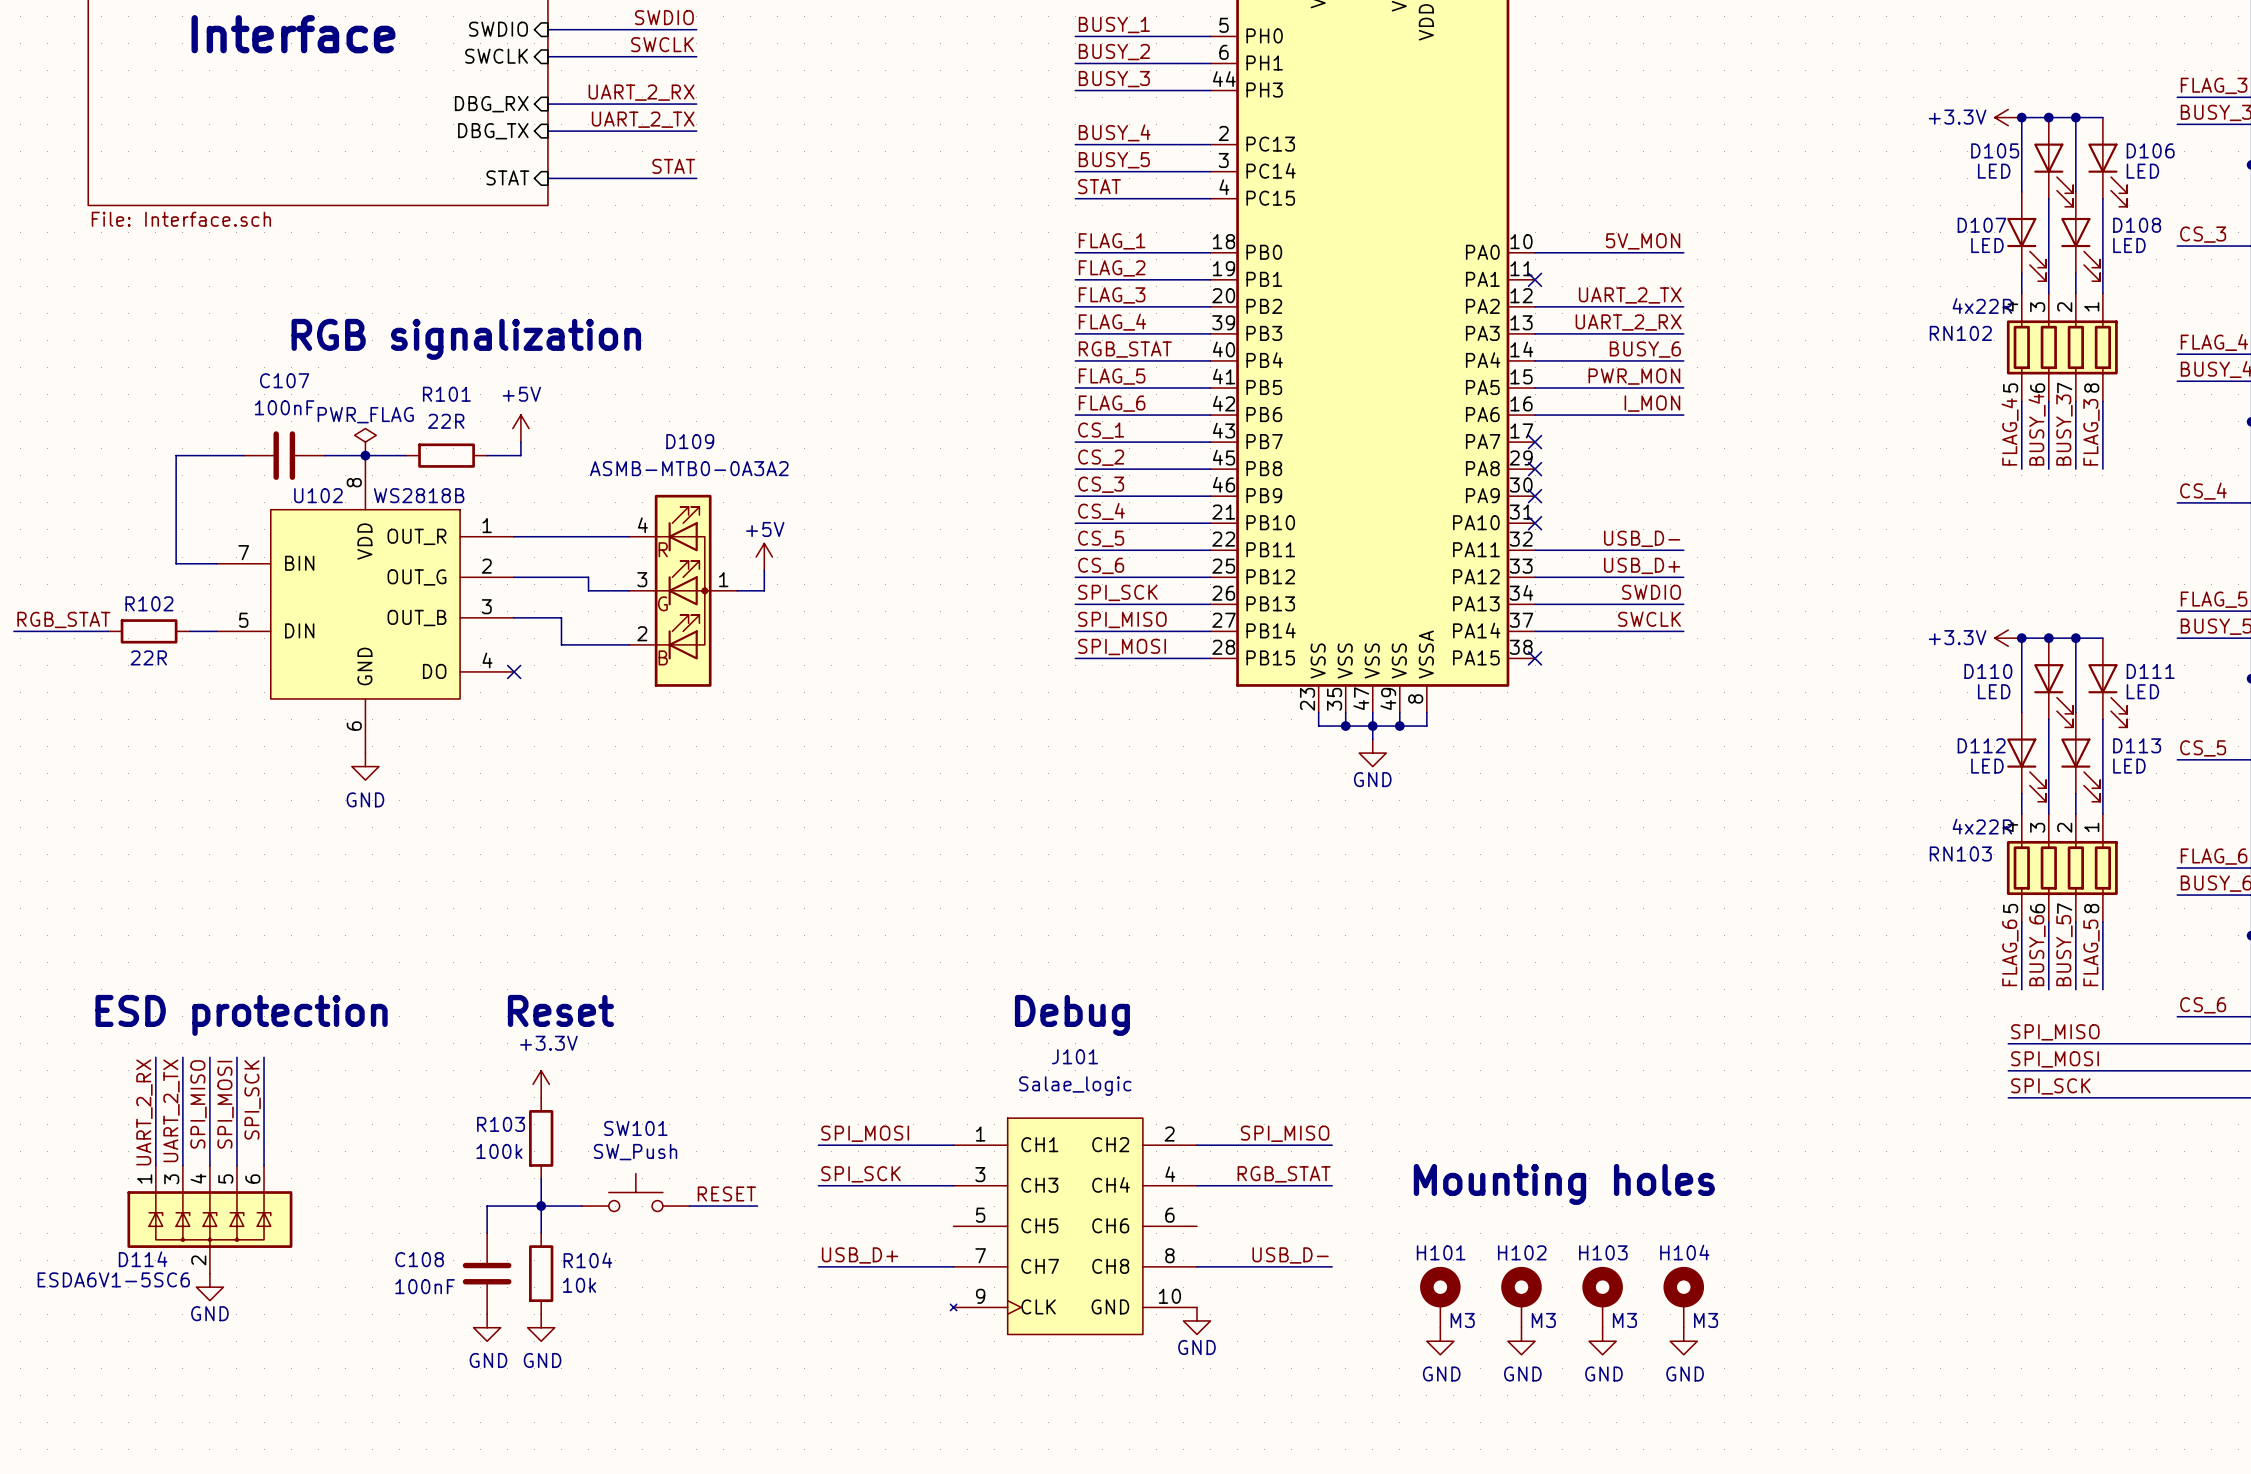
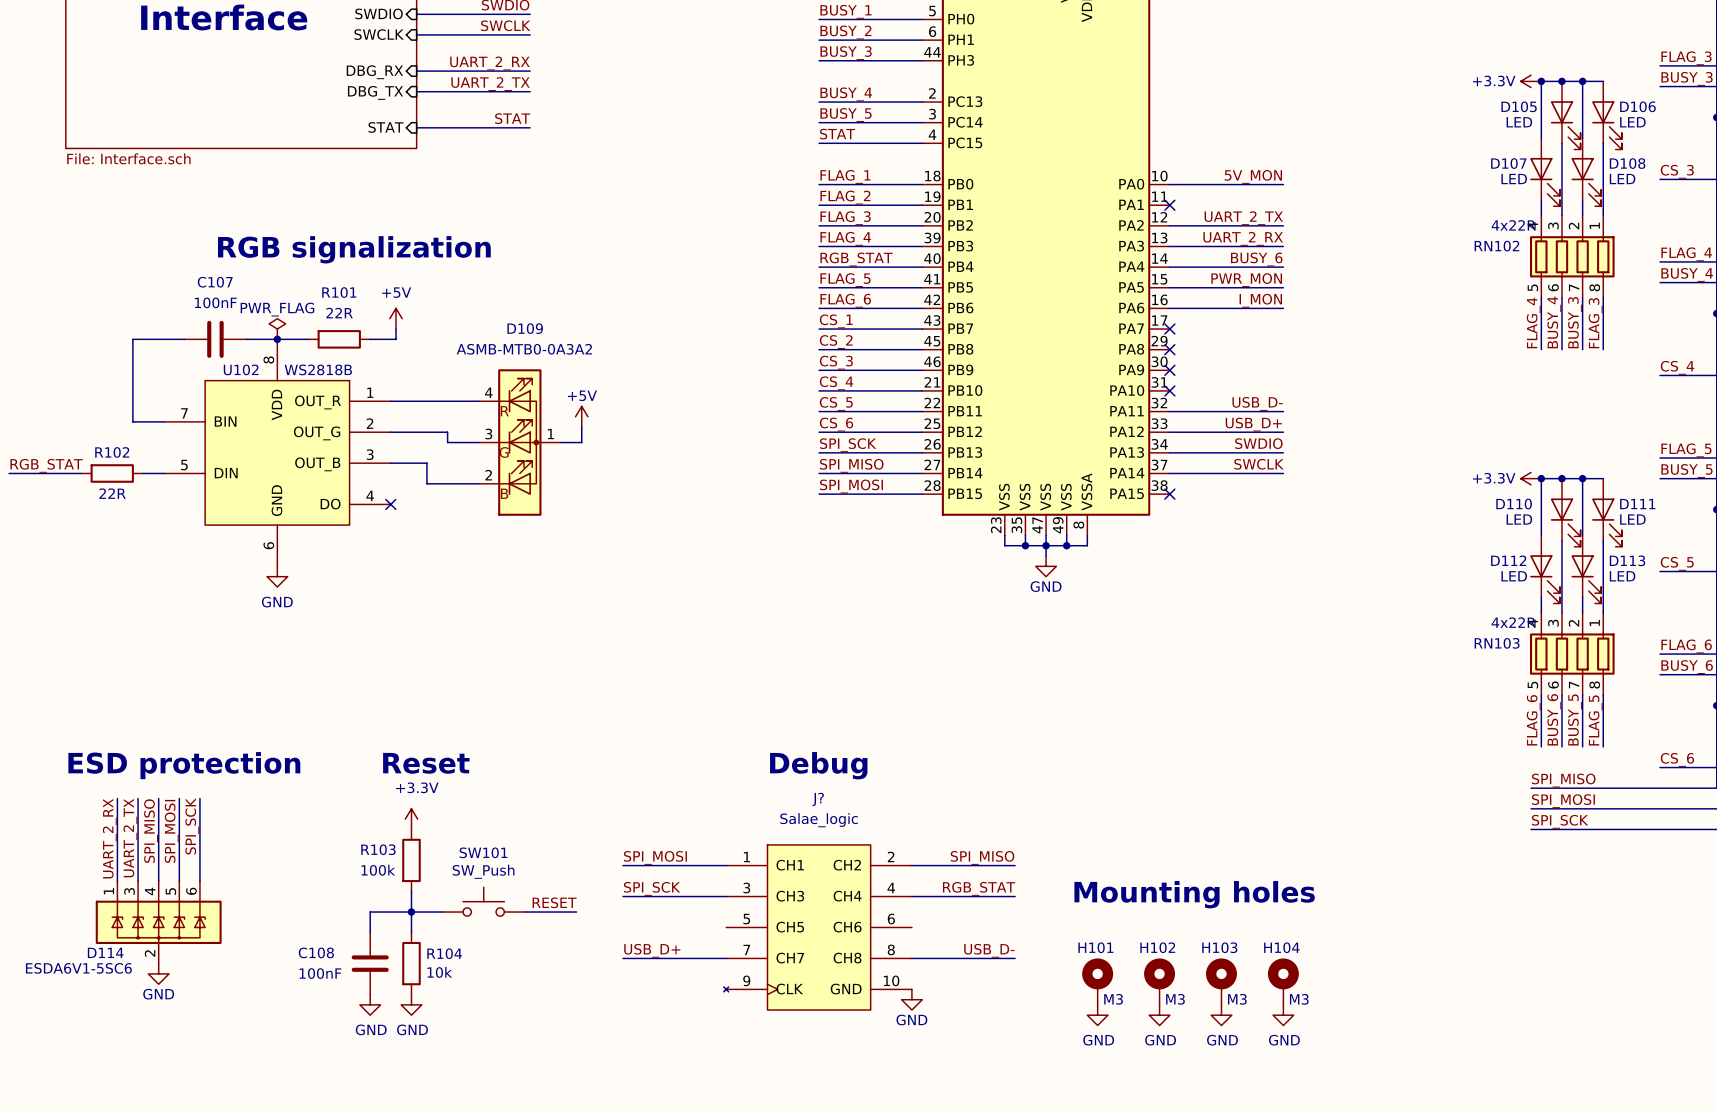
J101 name: J101 (1074, 1056) -> J? (818, 799)

